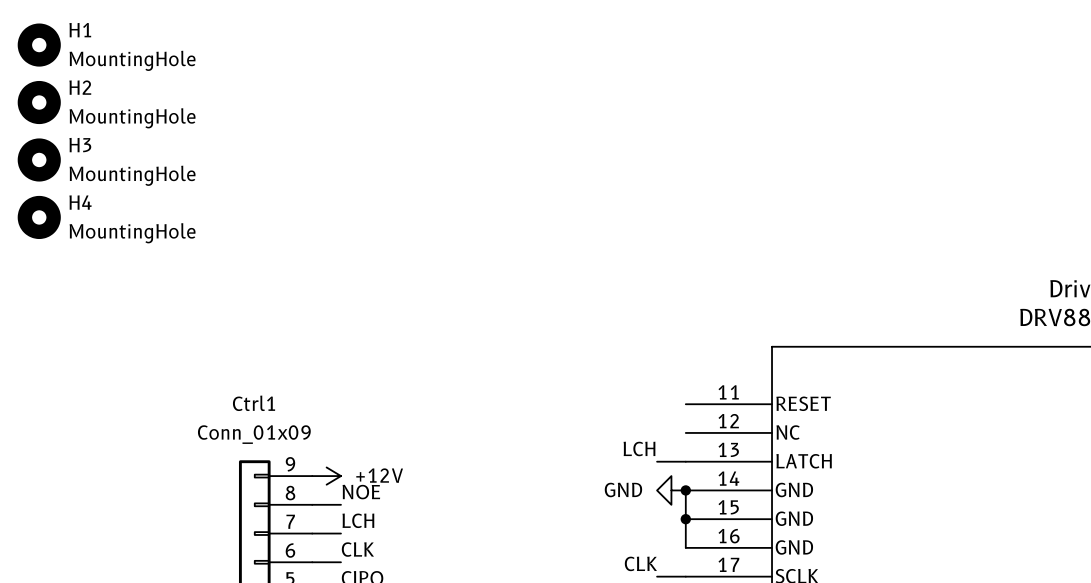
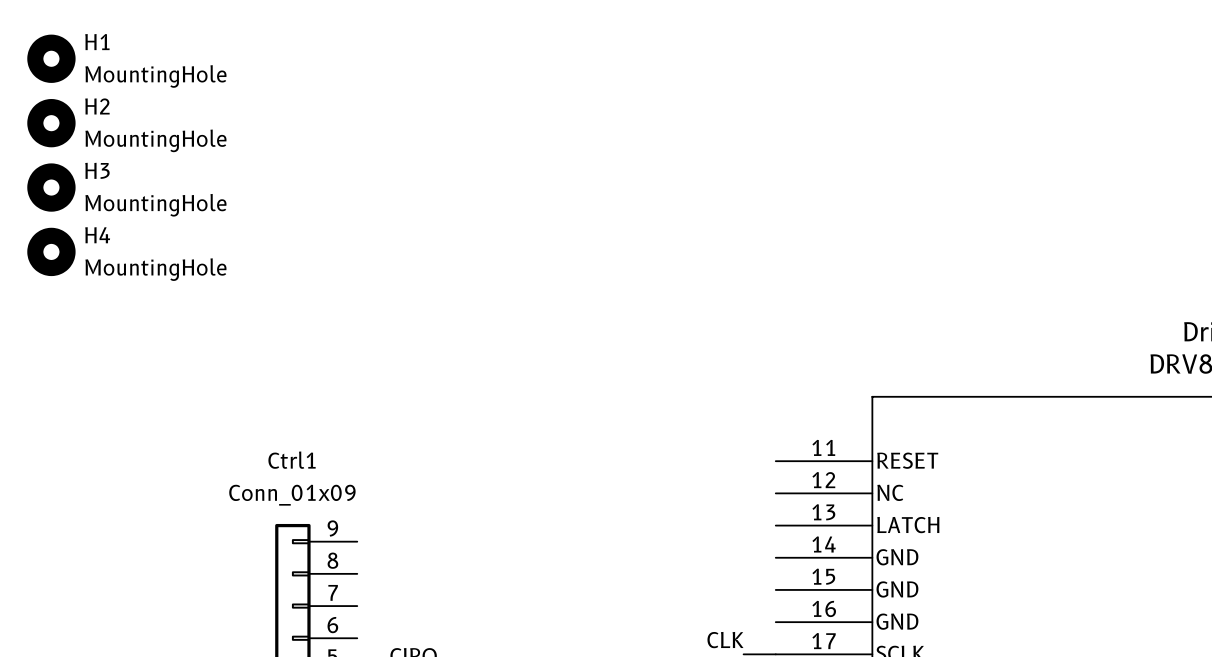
label: LCH (639, 448) -> none
wire: (657, 461) (685, 461) -> none
power symbol: +12V (326, 476) -> none
power symbol: GND (671, 490) -> none
wire: (685, 490) (685, 547) -> none
junction: (685, 490) -> none
label: NOE (361, 492) -> none
wire: (312, 504) (340, 504) -> none
junction: (685, 519) -> none
label: LCH (358, 520) -> none
wire: (312, 533) (340, 533) -> none
label: CLK (357, 549) -> none
wire: (312, 562) (340, 562) -> none

